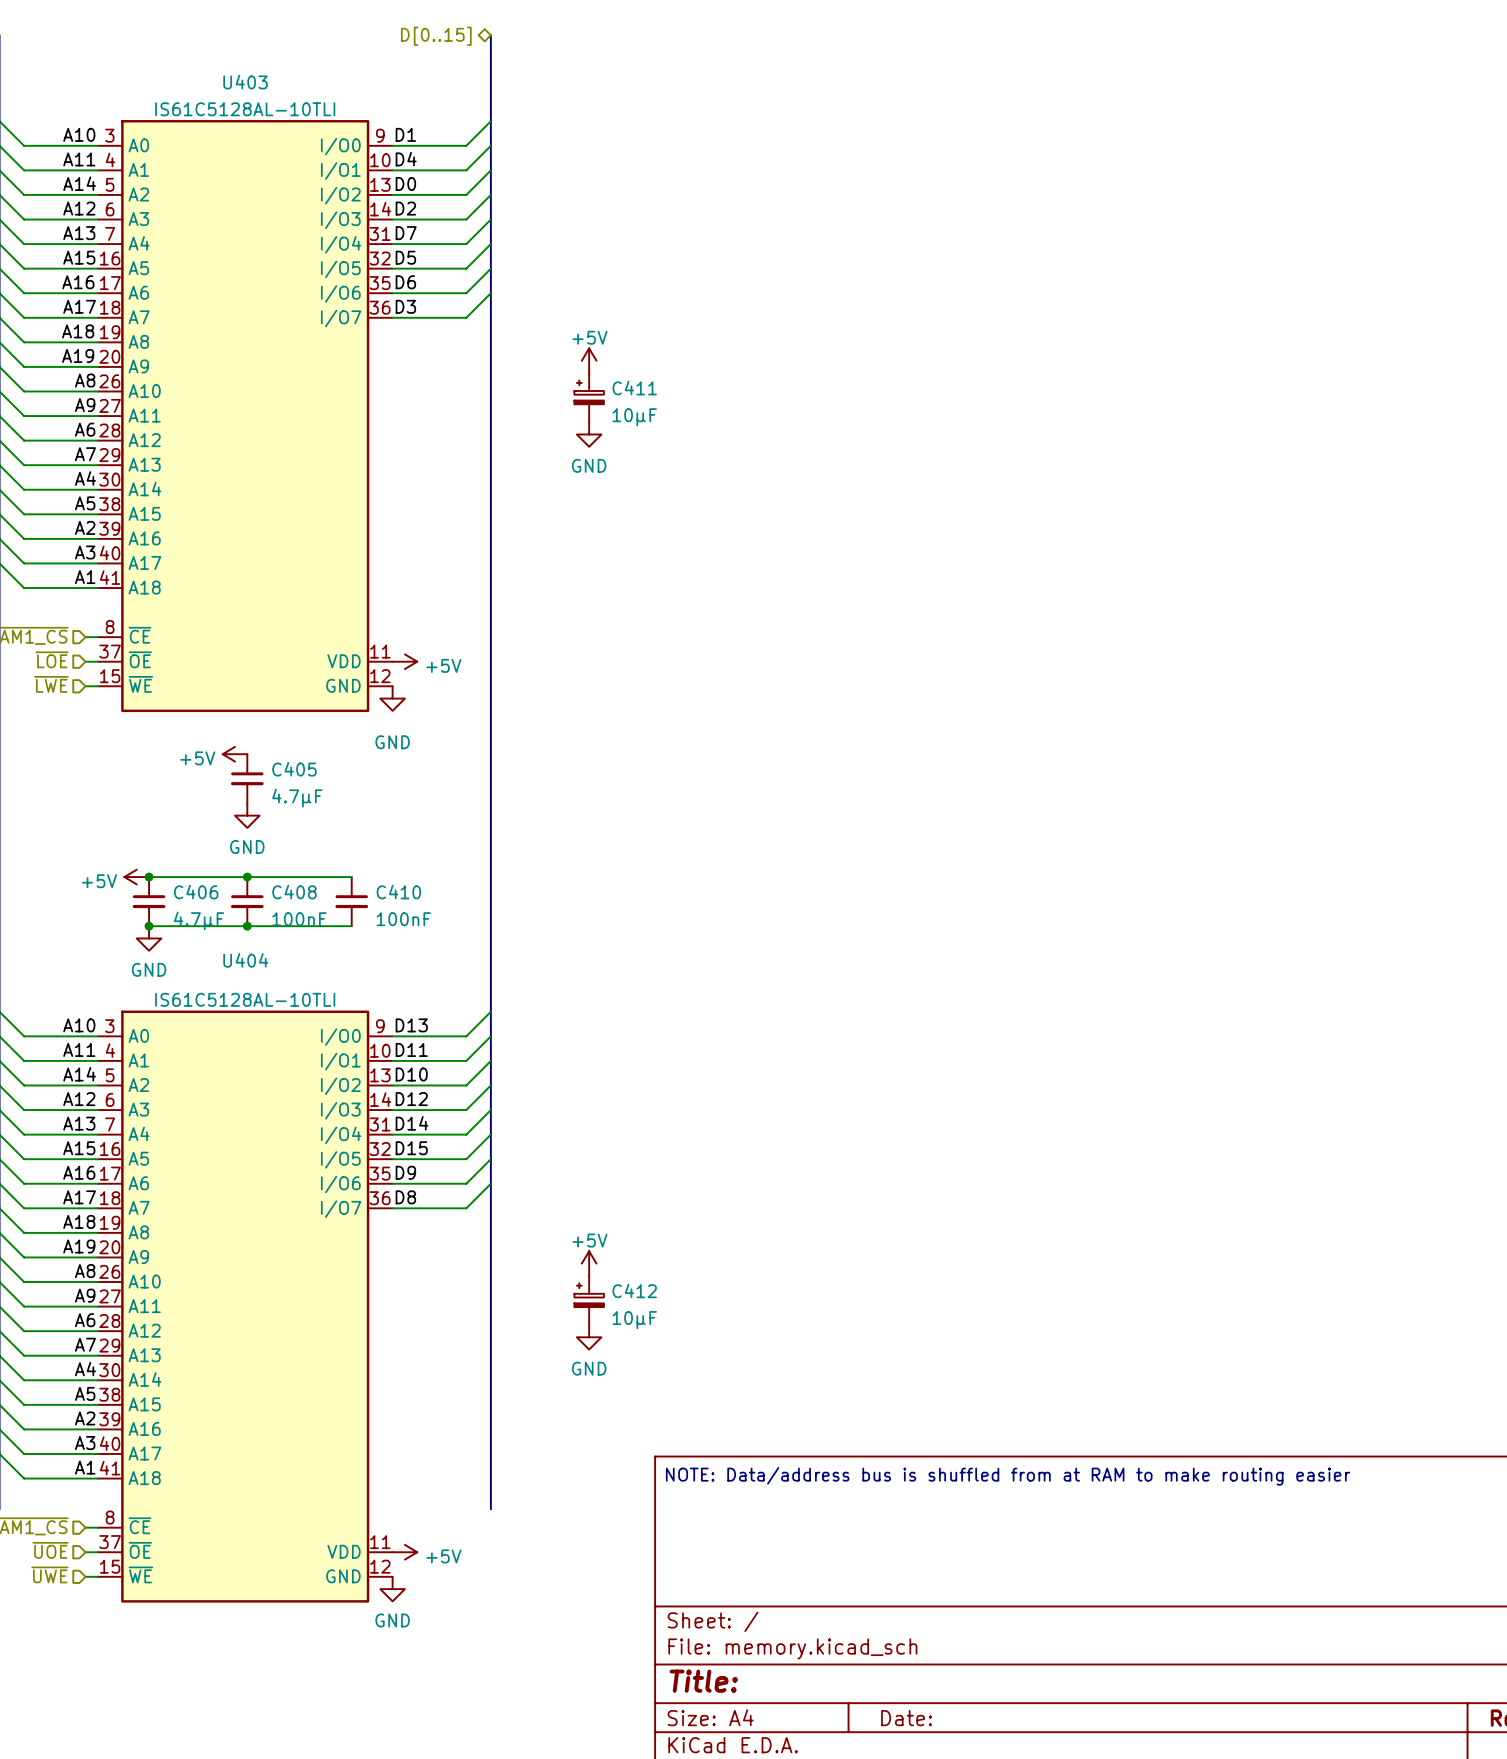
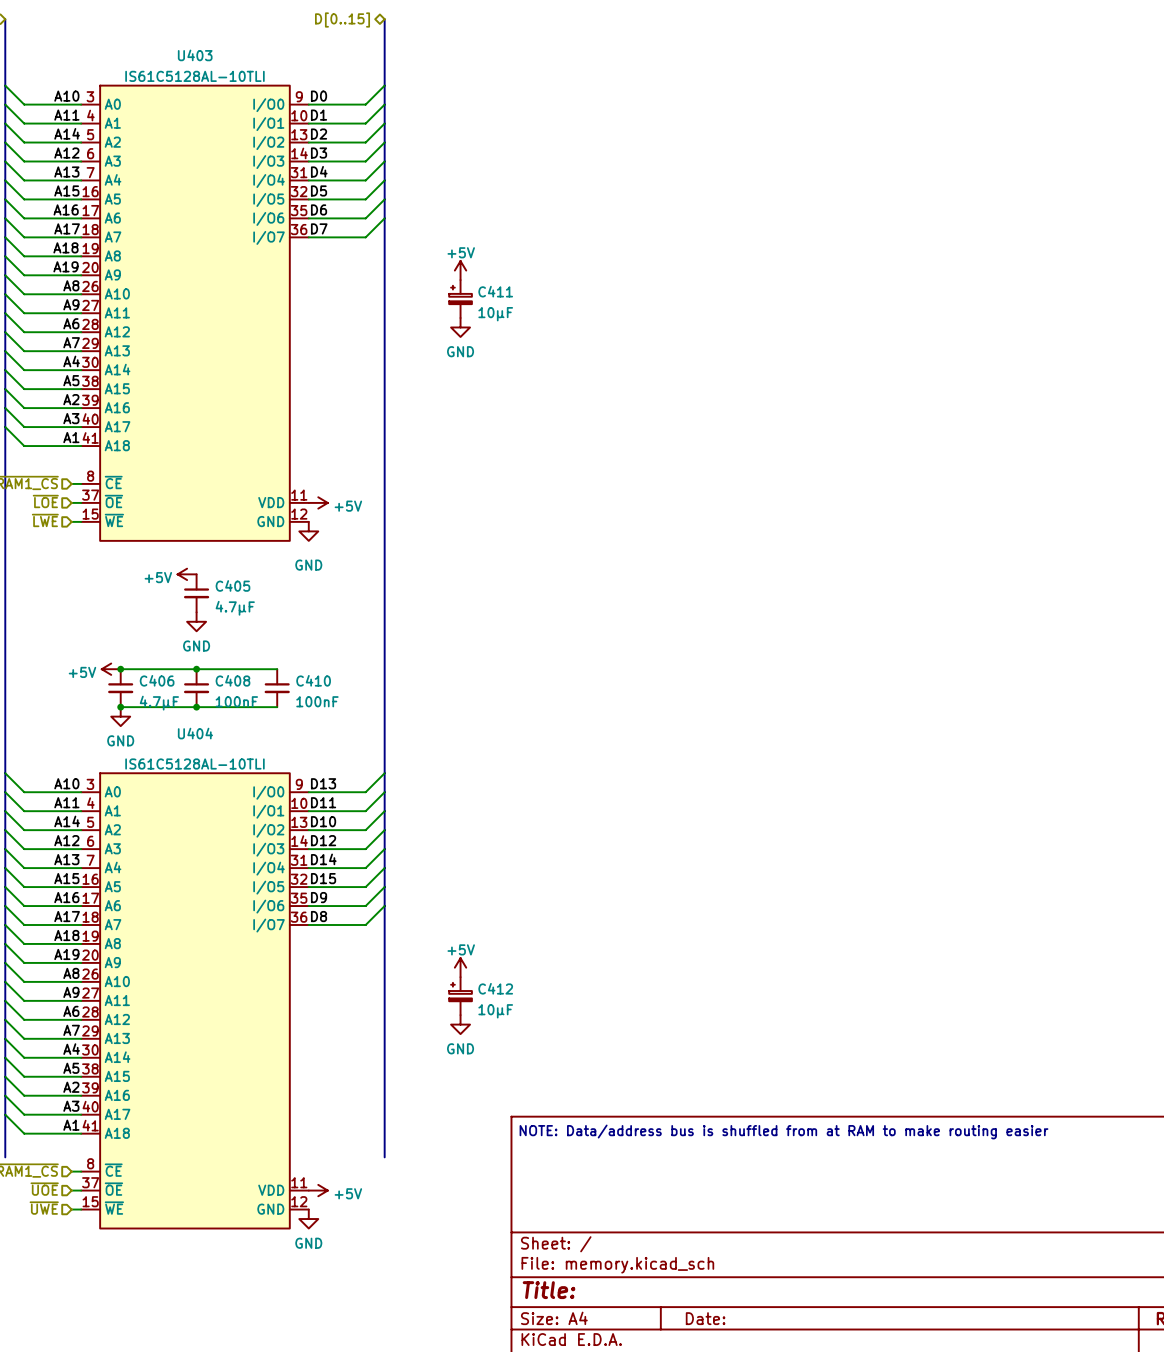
label: D1 (405, 134) -> D0 (319, 96)
label: D4 (406, 159) -> D1 (319, 115)
label: D0 (405, 183) -> D2 (319, 134)
label: D2 (405, 208) -> D3 (319, 153)
label: D7 (406, 233) -> D4 (319, 171)
label: D3 (405, 306) -> D7 (319, 228)

